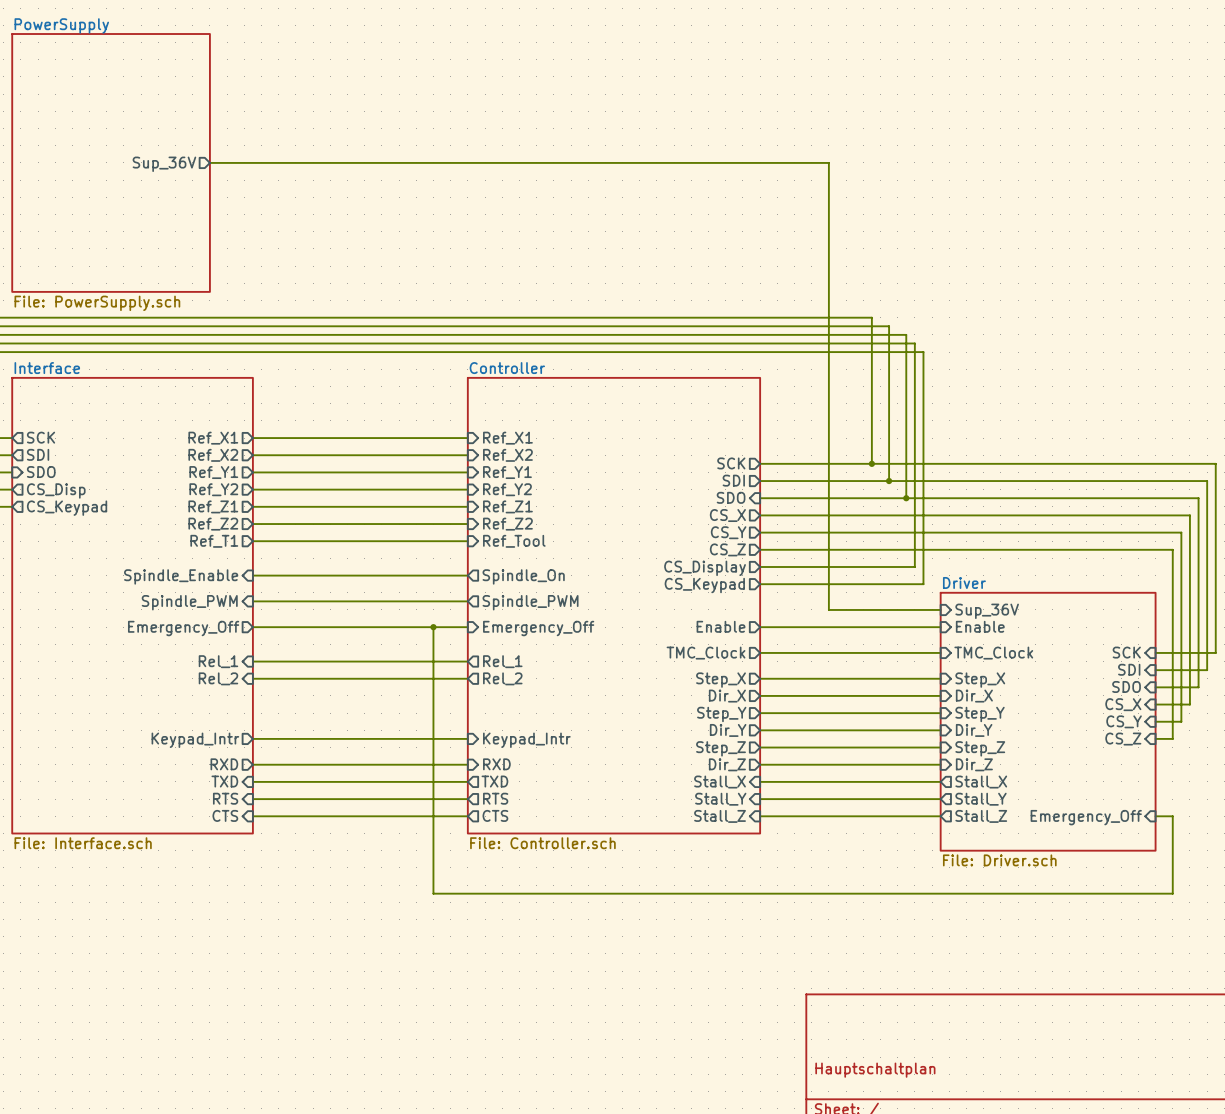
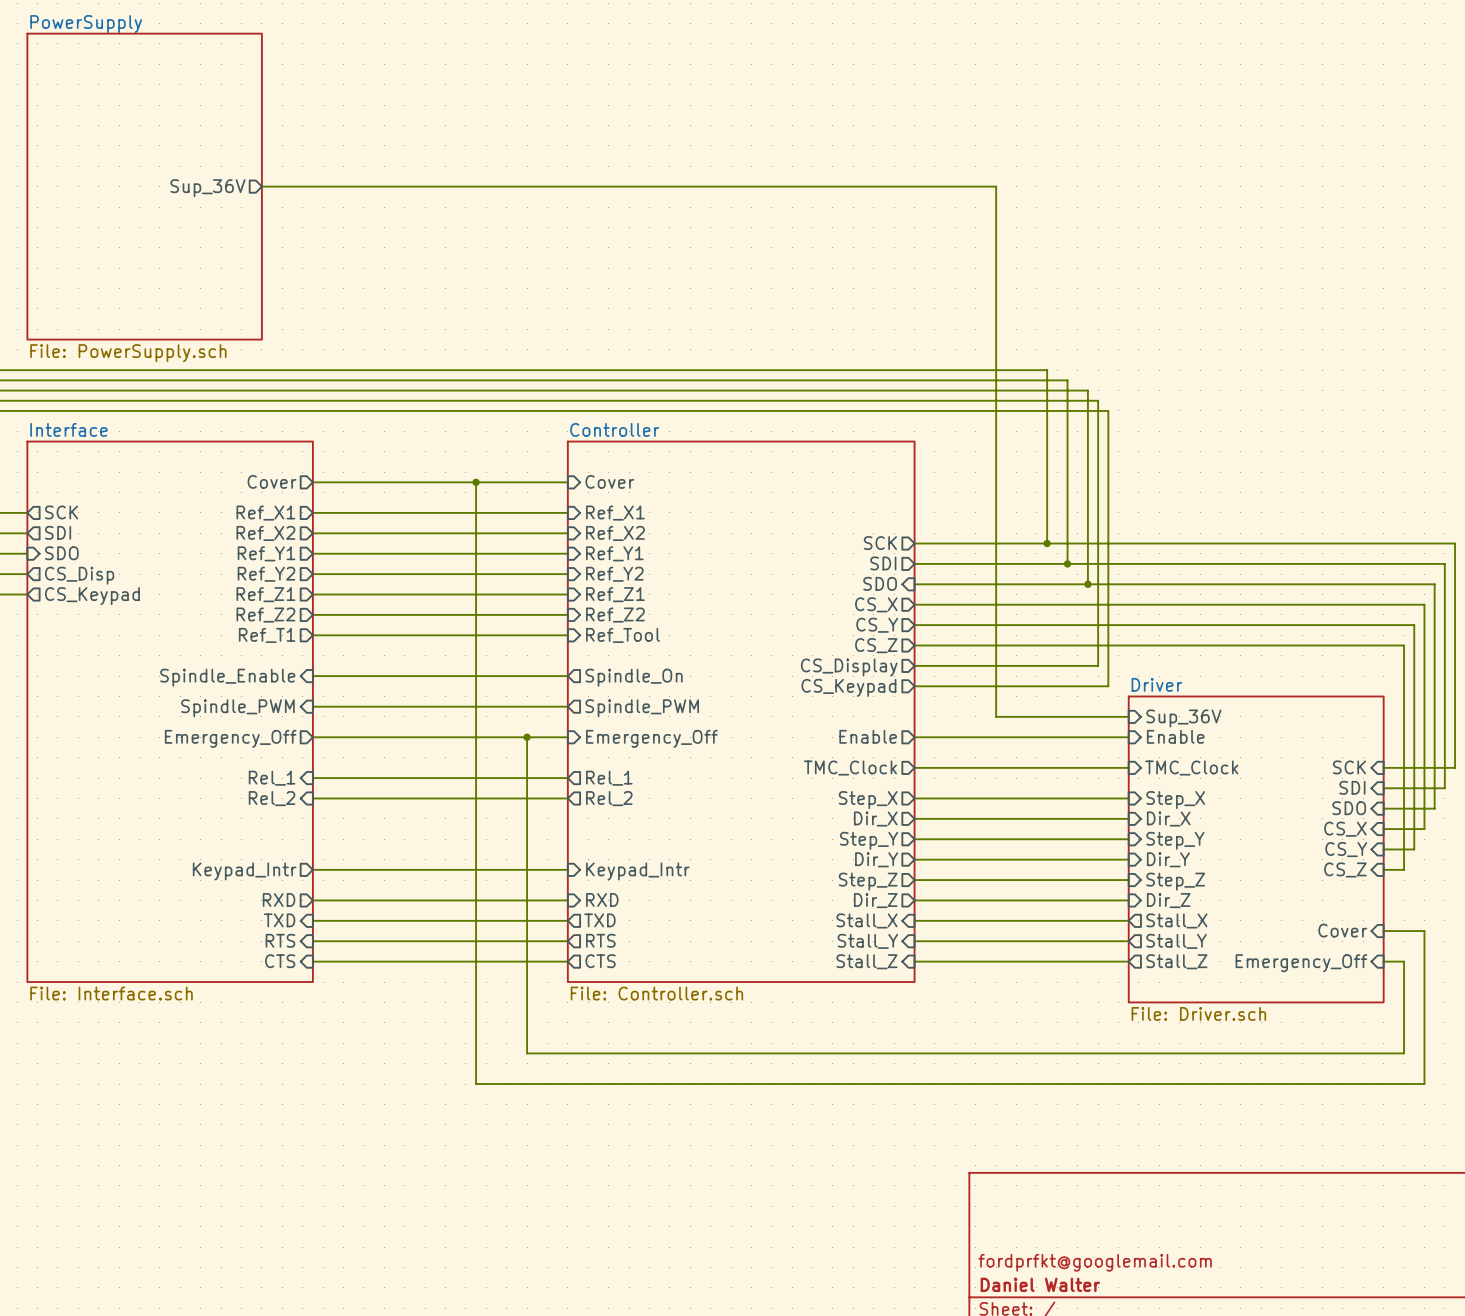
sheet pin: none -> Cover (272, 481)
sheet pin: none -> Cover (609, 481)
wire: none -> (312, 482) (567, 482)
wire: none -> (476, 482) (476, 1084) (1424, 1084) (1424, 931) (1383, 931)
junction: none -> (476, 482)
sheet pin: none -> Cover (1342, 930)
title block: Hauptschaltplan (875, 1070) -> fordprfkt@googlemail.com (1095, 1262)
title block: none -> Daniel Walter (1040, 1284)

